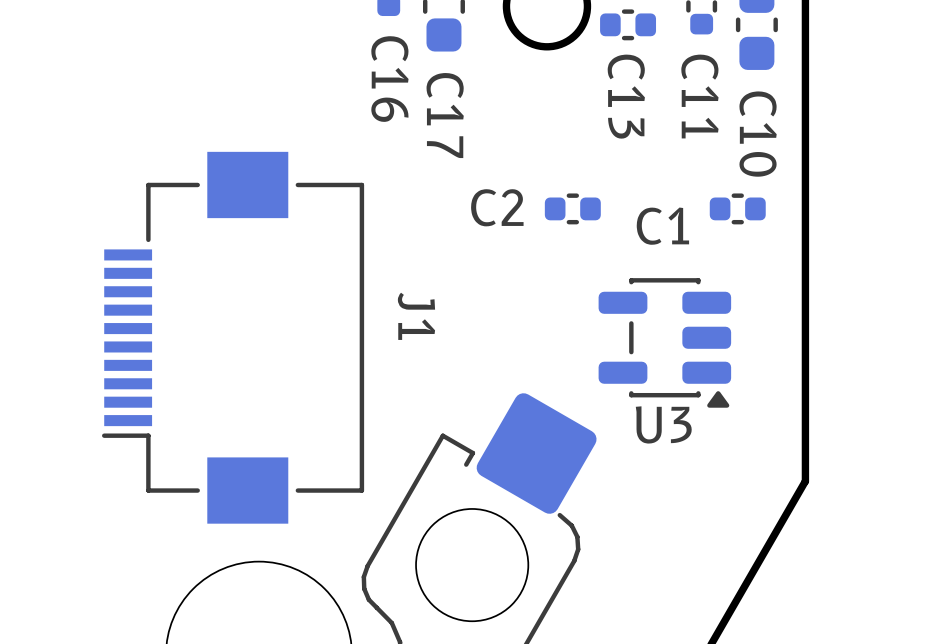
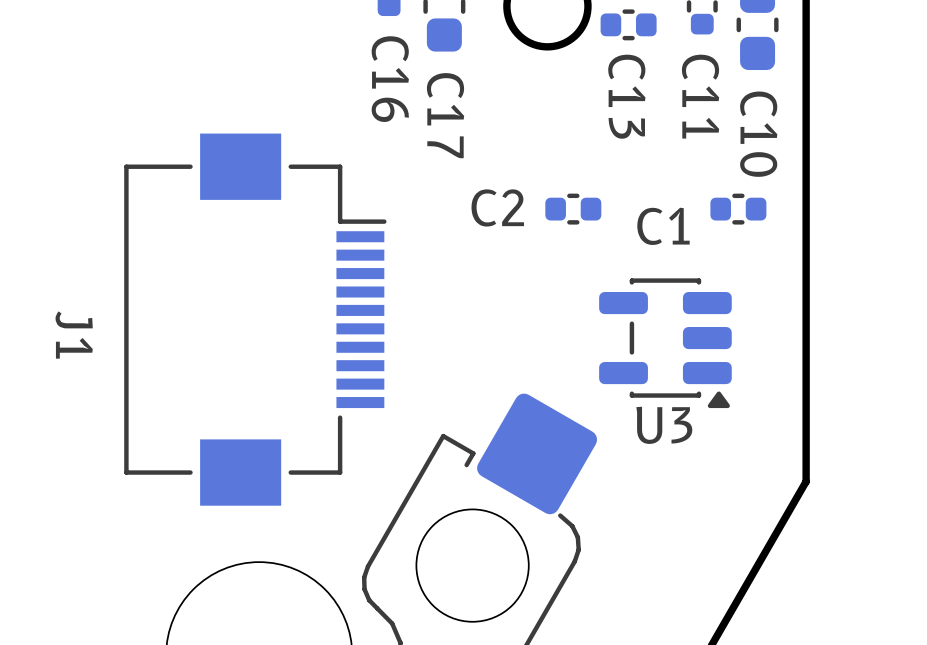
J1 rotation: 0° (233, 337) -> 180° (255, 319)

